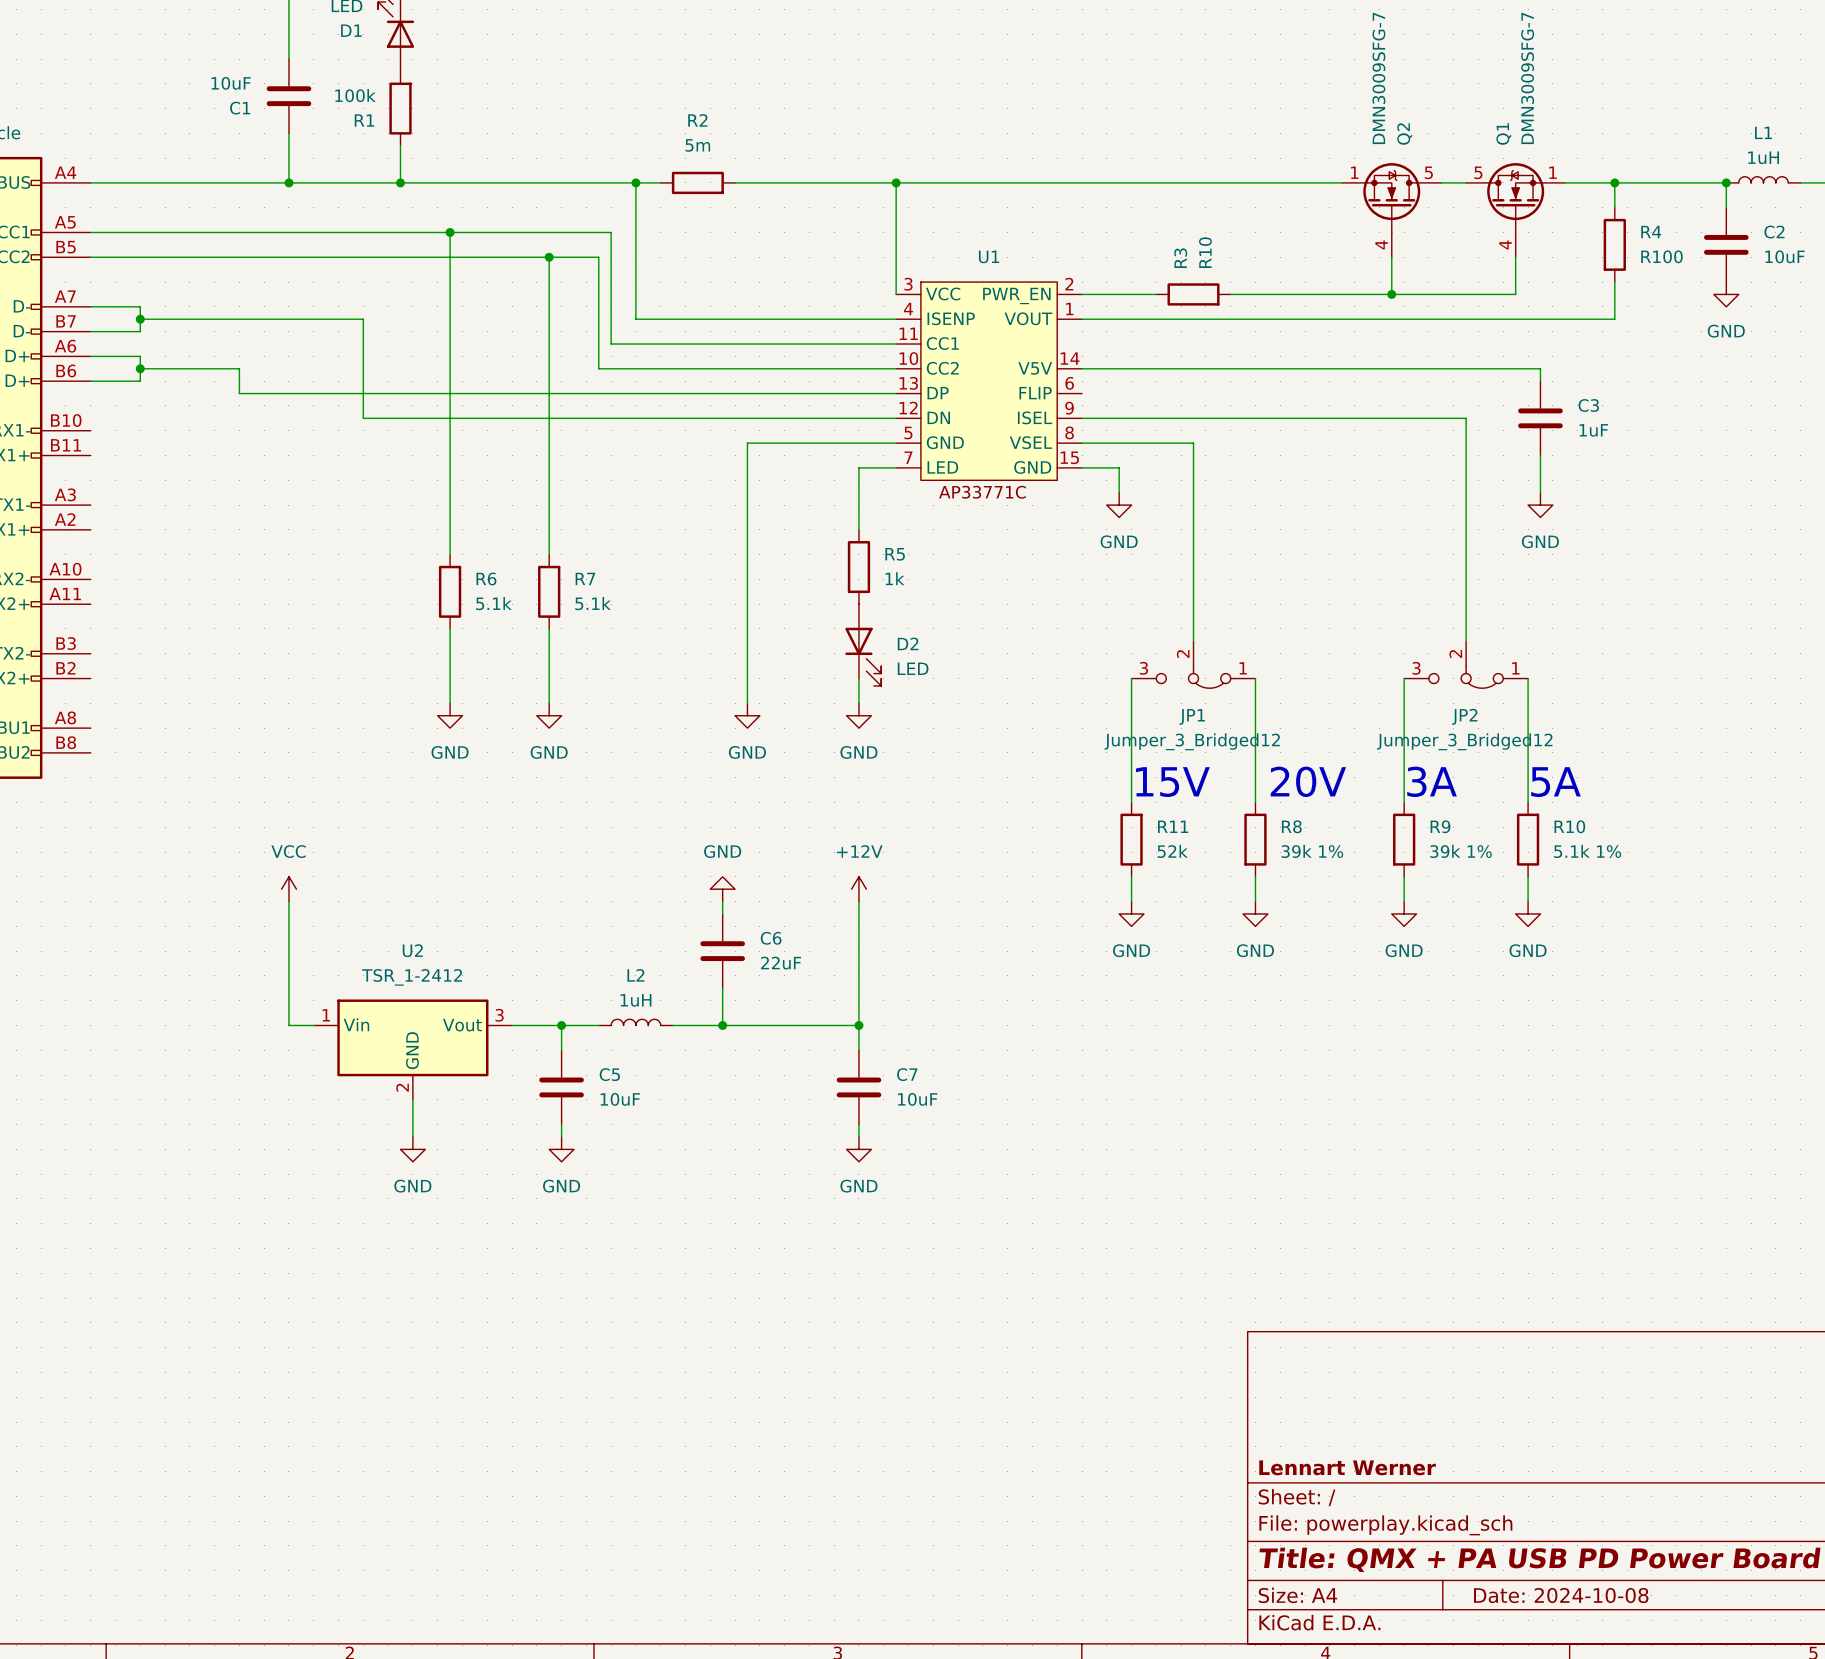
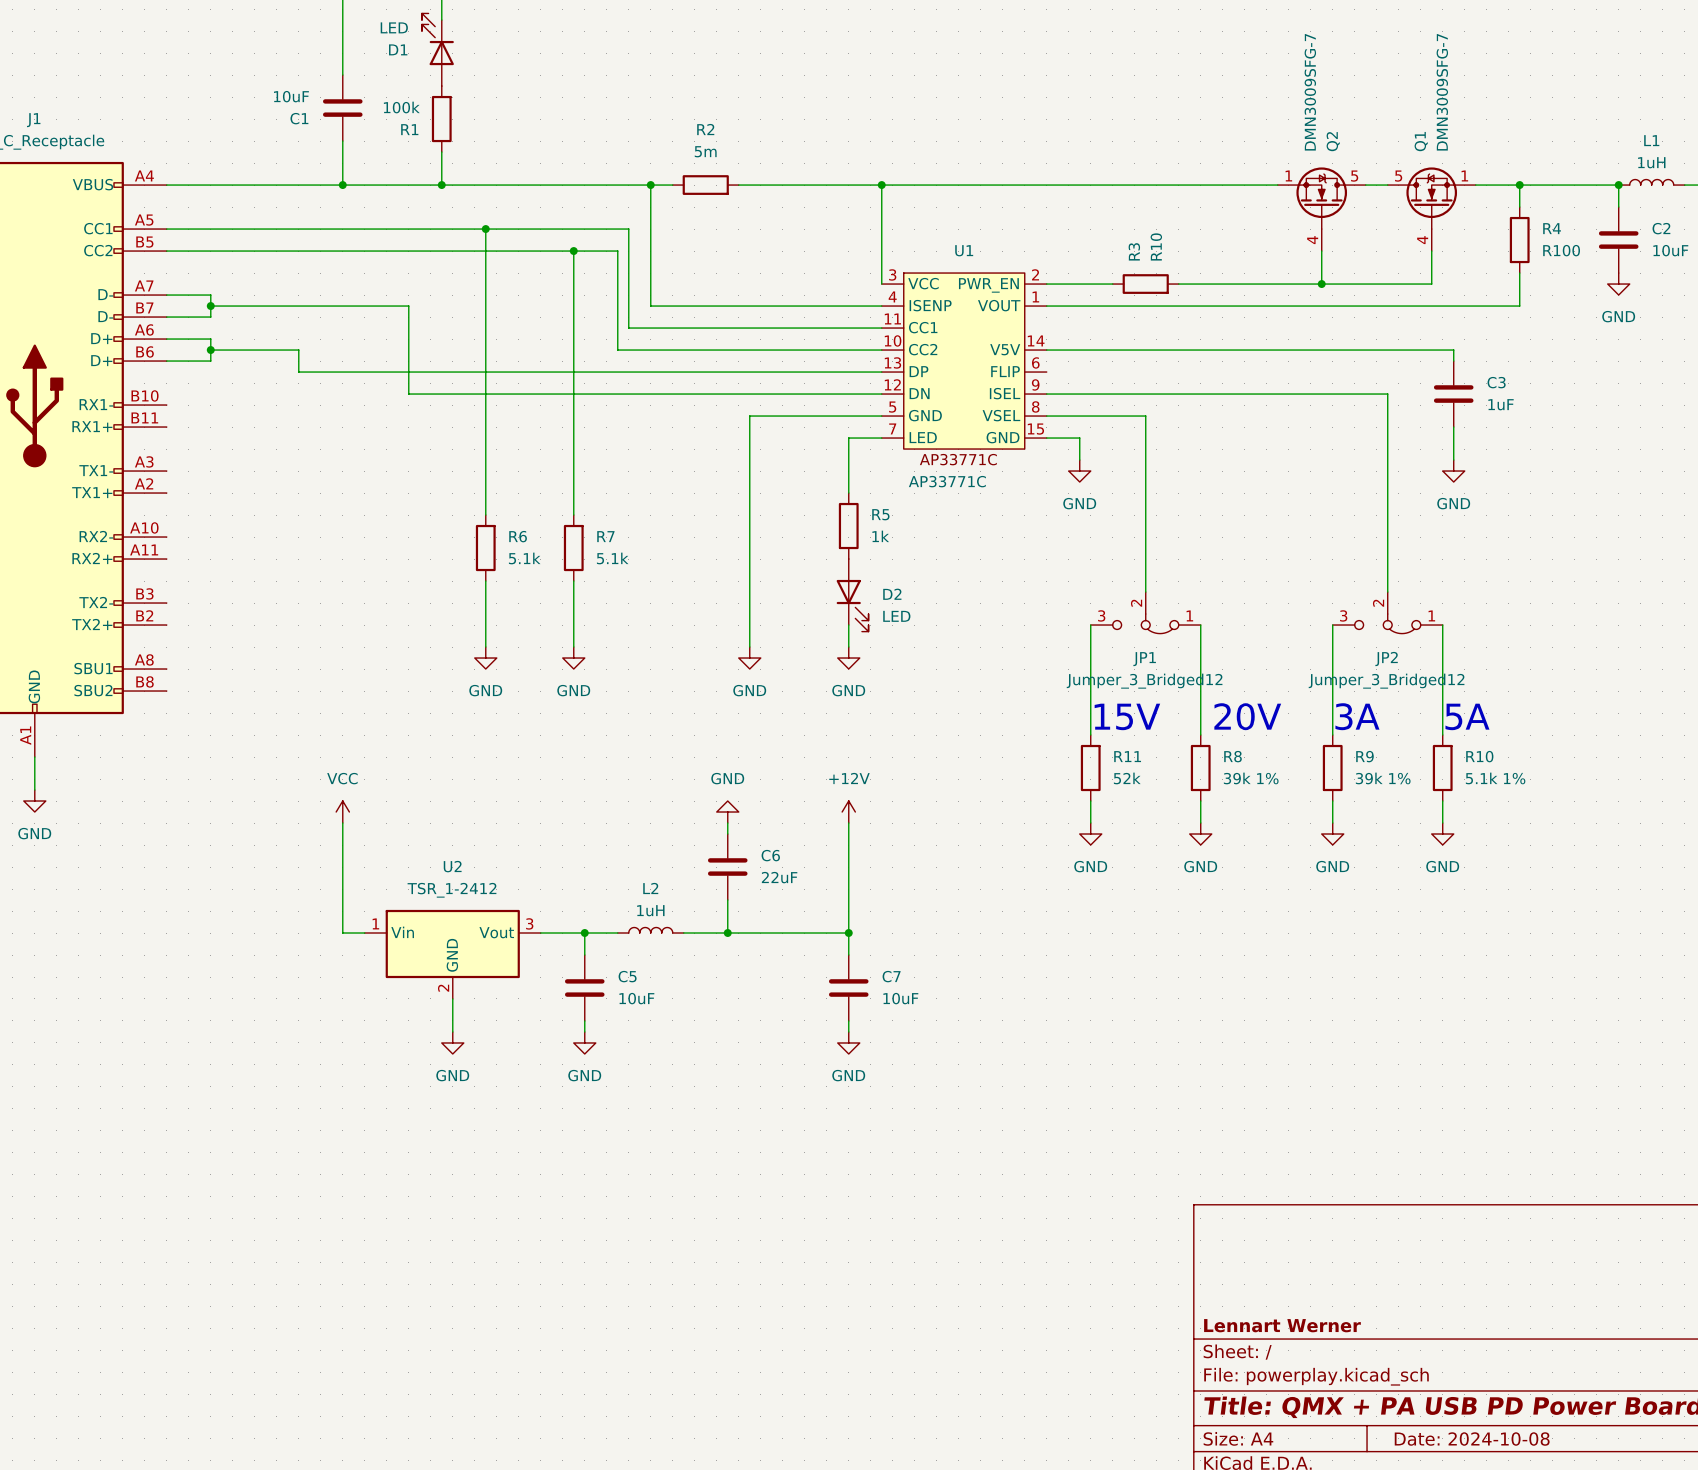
U1 value: none -> AP33771C (947, 481)

